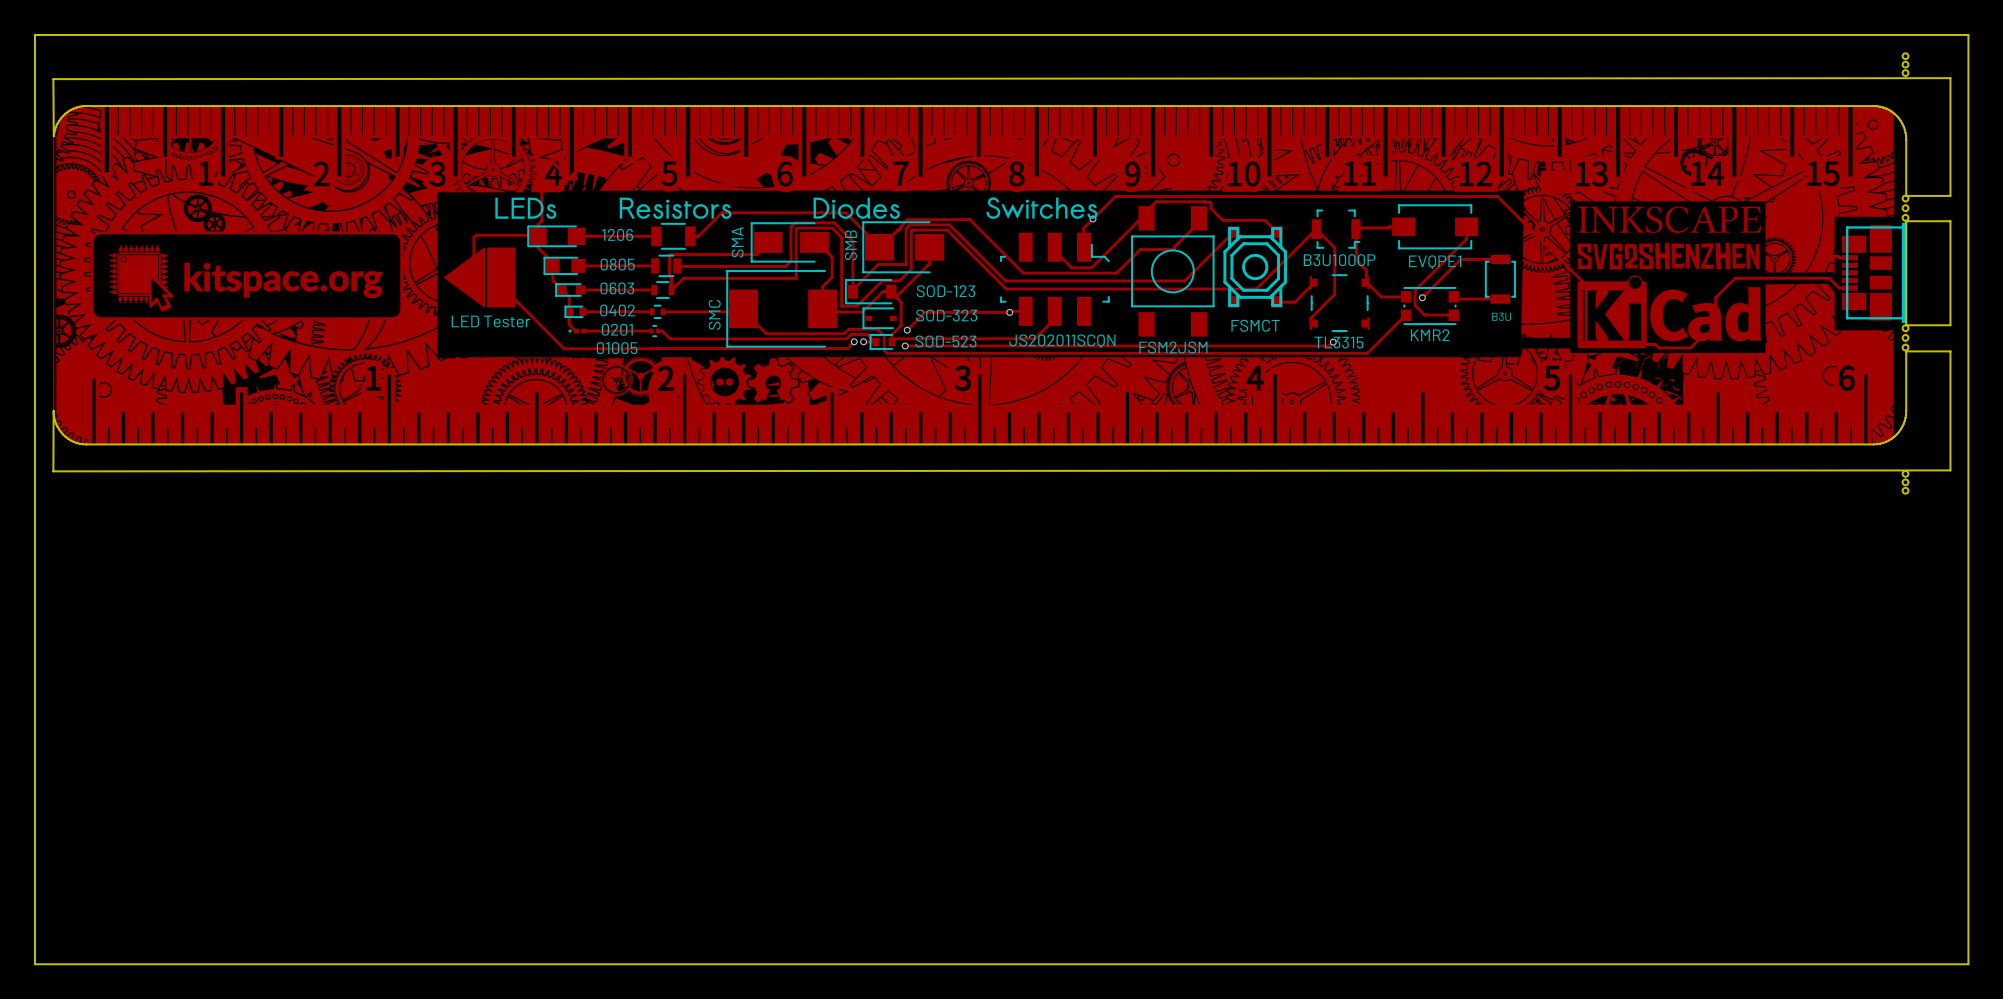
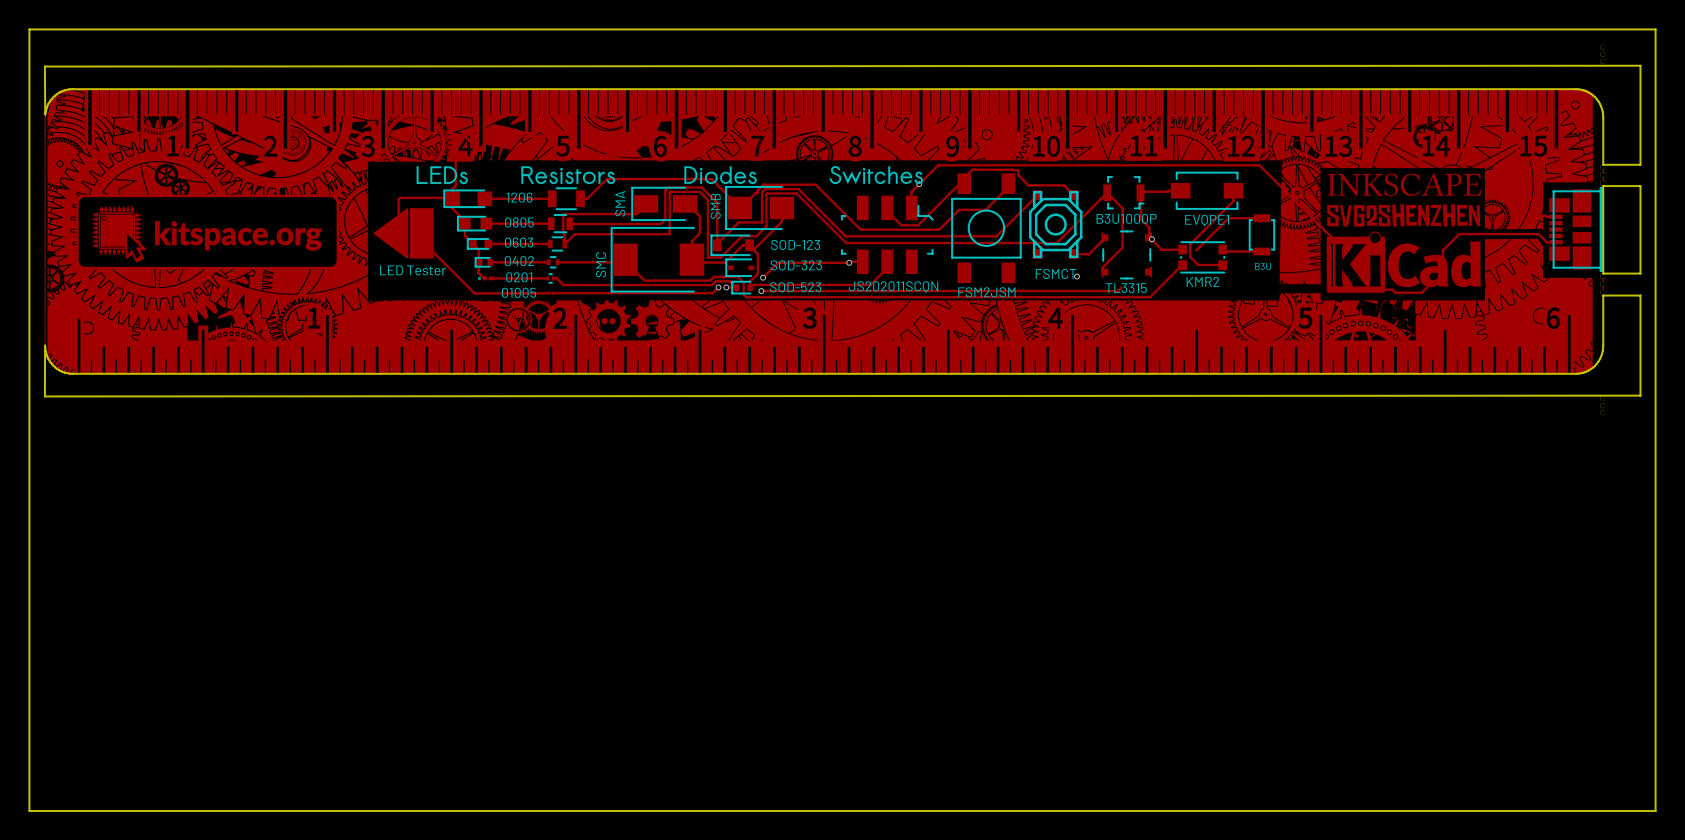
part footprint: [52, 53, 1952, 494] -> [44, 44, 1641, 416]
via: none -> (1151, 239)
via: (1422, 297) -> none
via: none -> (1076, 276)
via: (1333, 342) -> none

